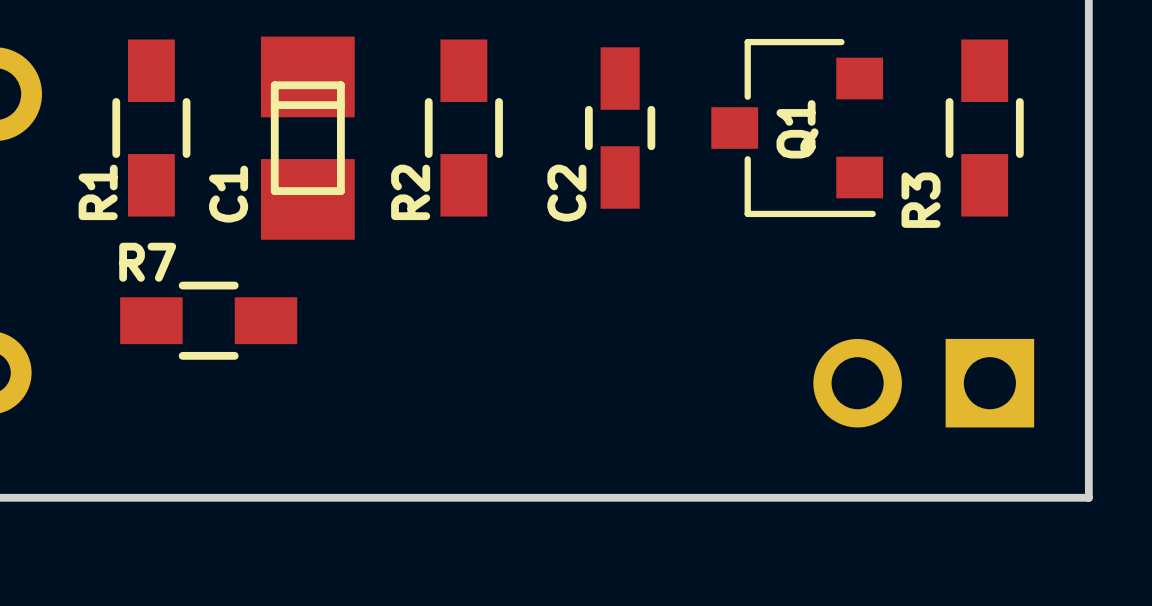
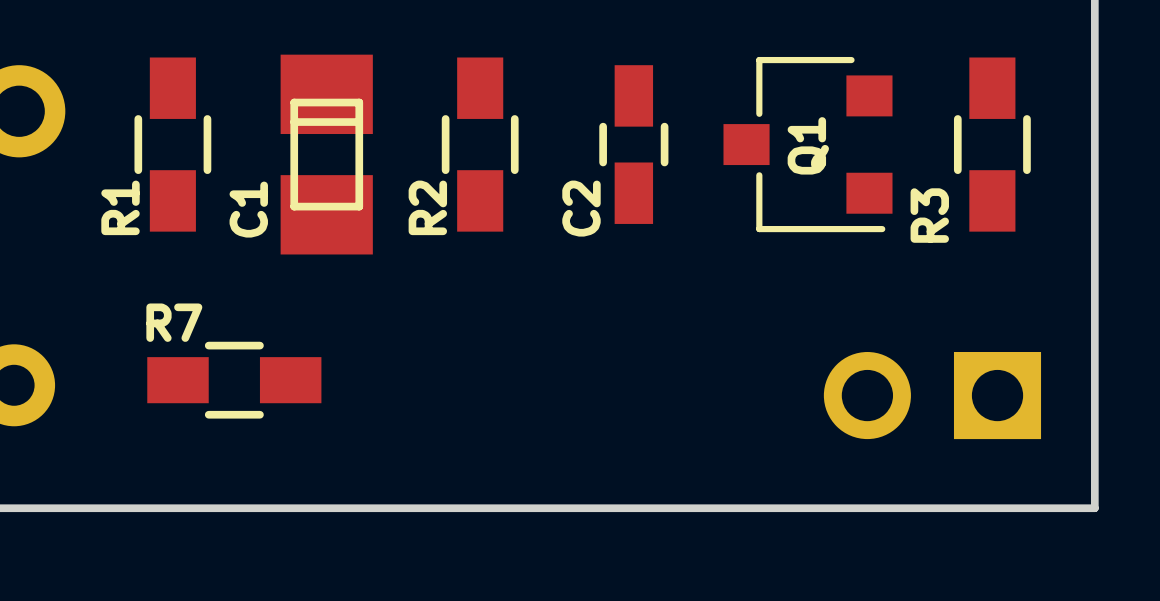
R7 position: (208, 320) -> (234, 380)

